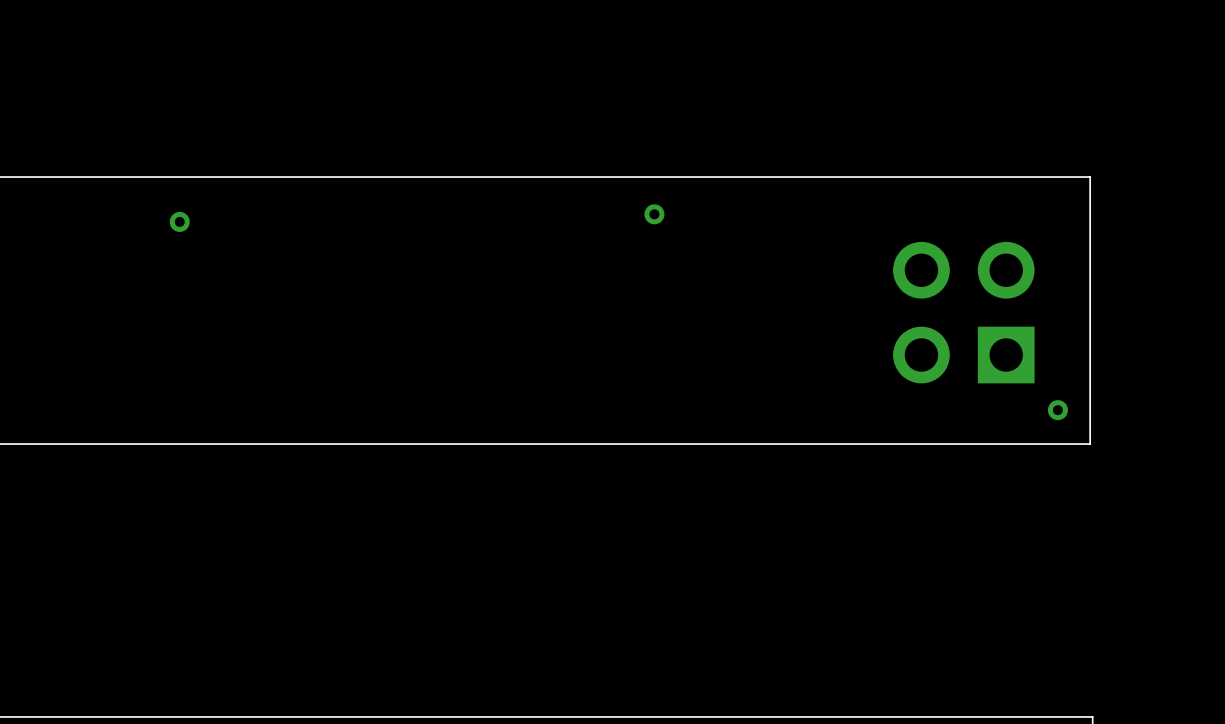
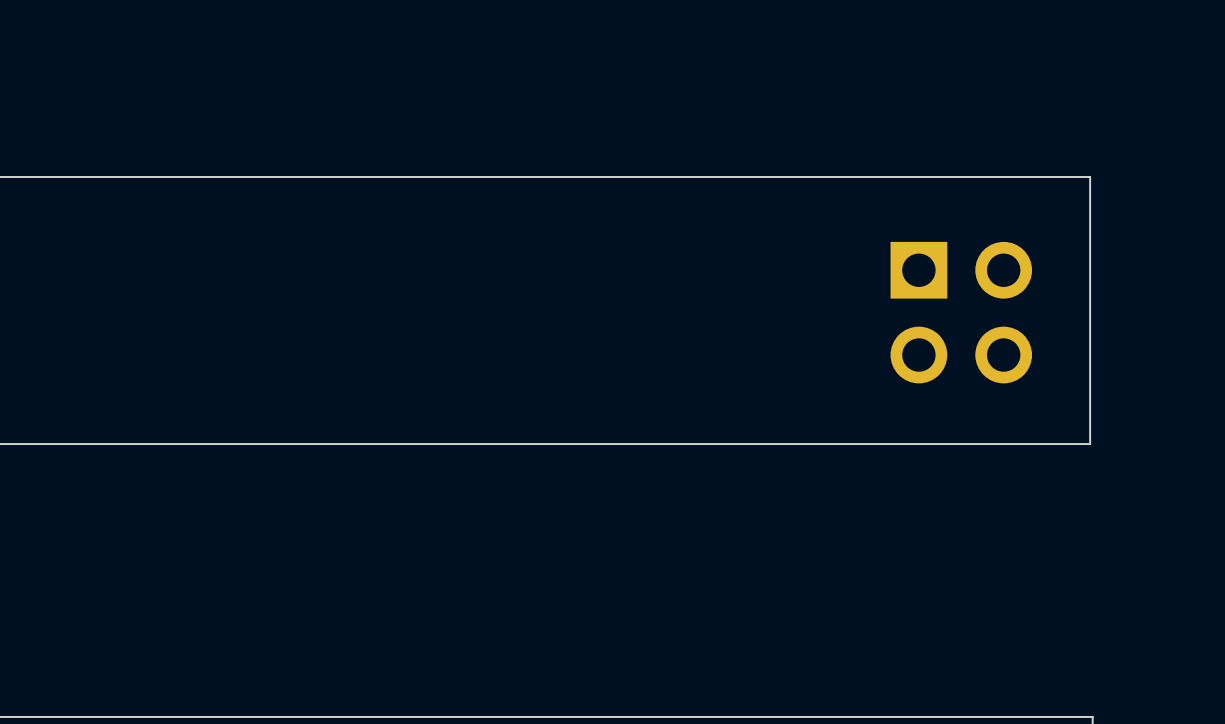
via: (654, 214) -> none
via: (179, 221) -> none
part rotation: 0° (963, 312) -> 180° (961, 312)
via: (1057, 410) -> none

